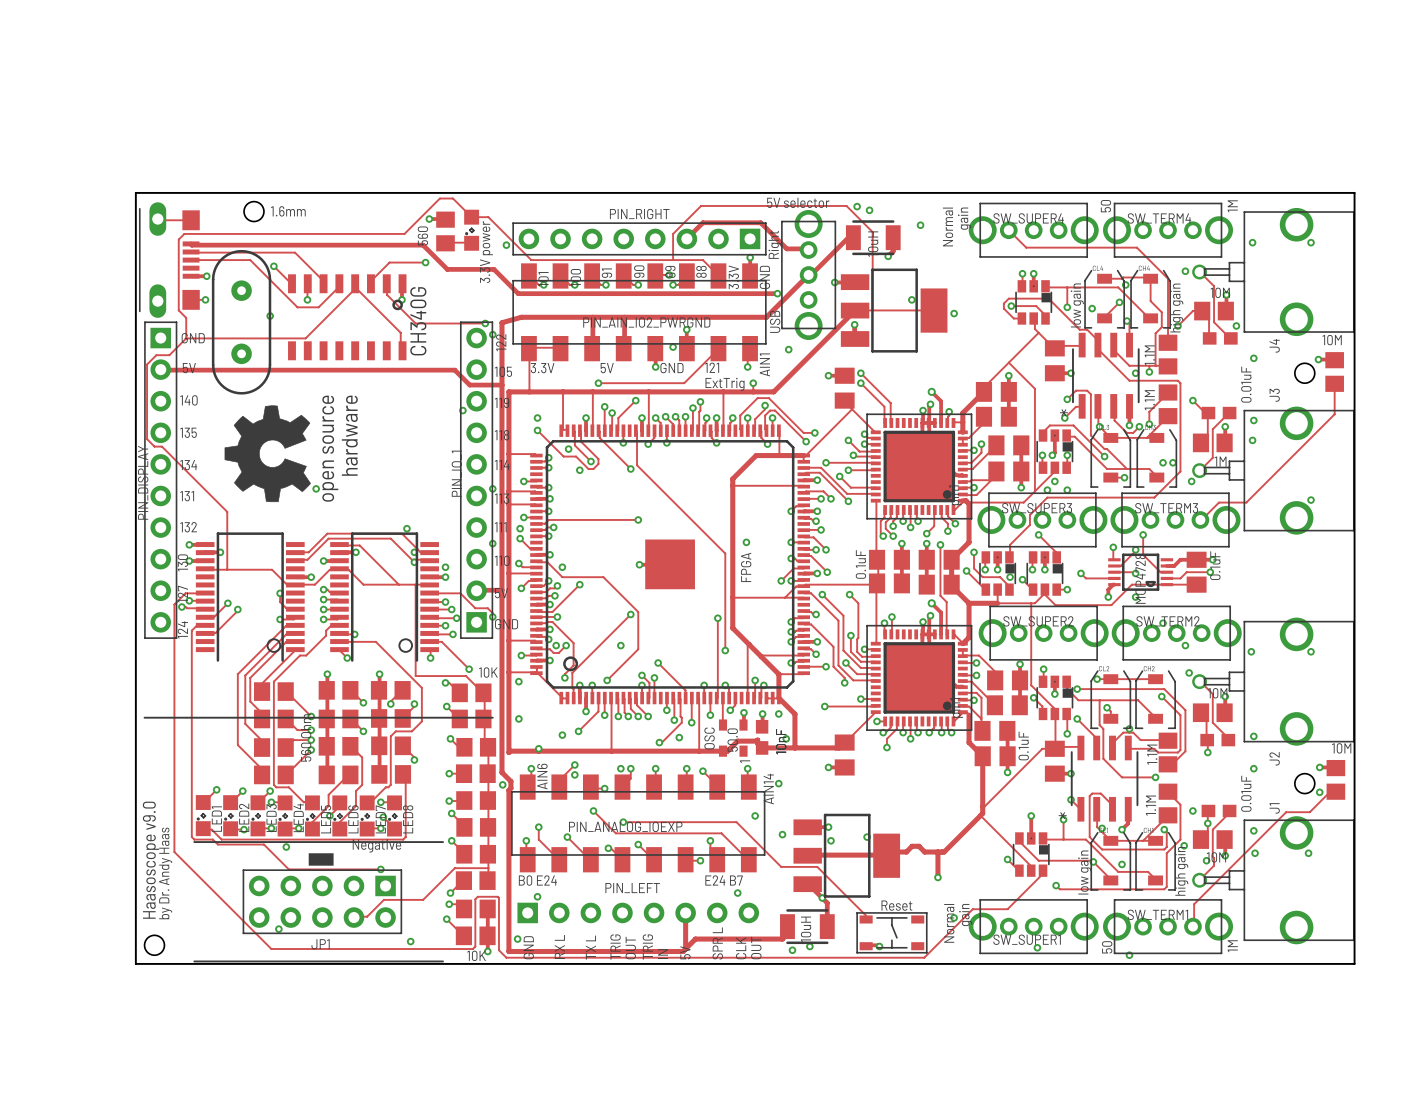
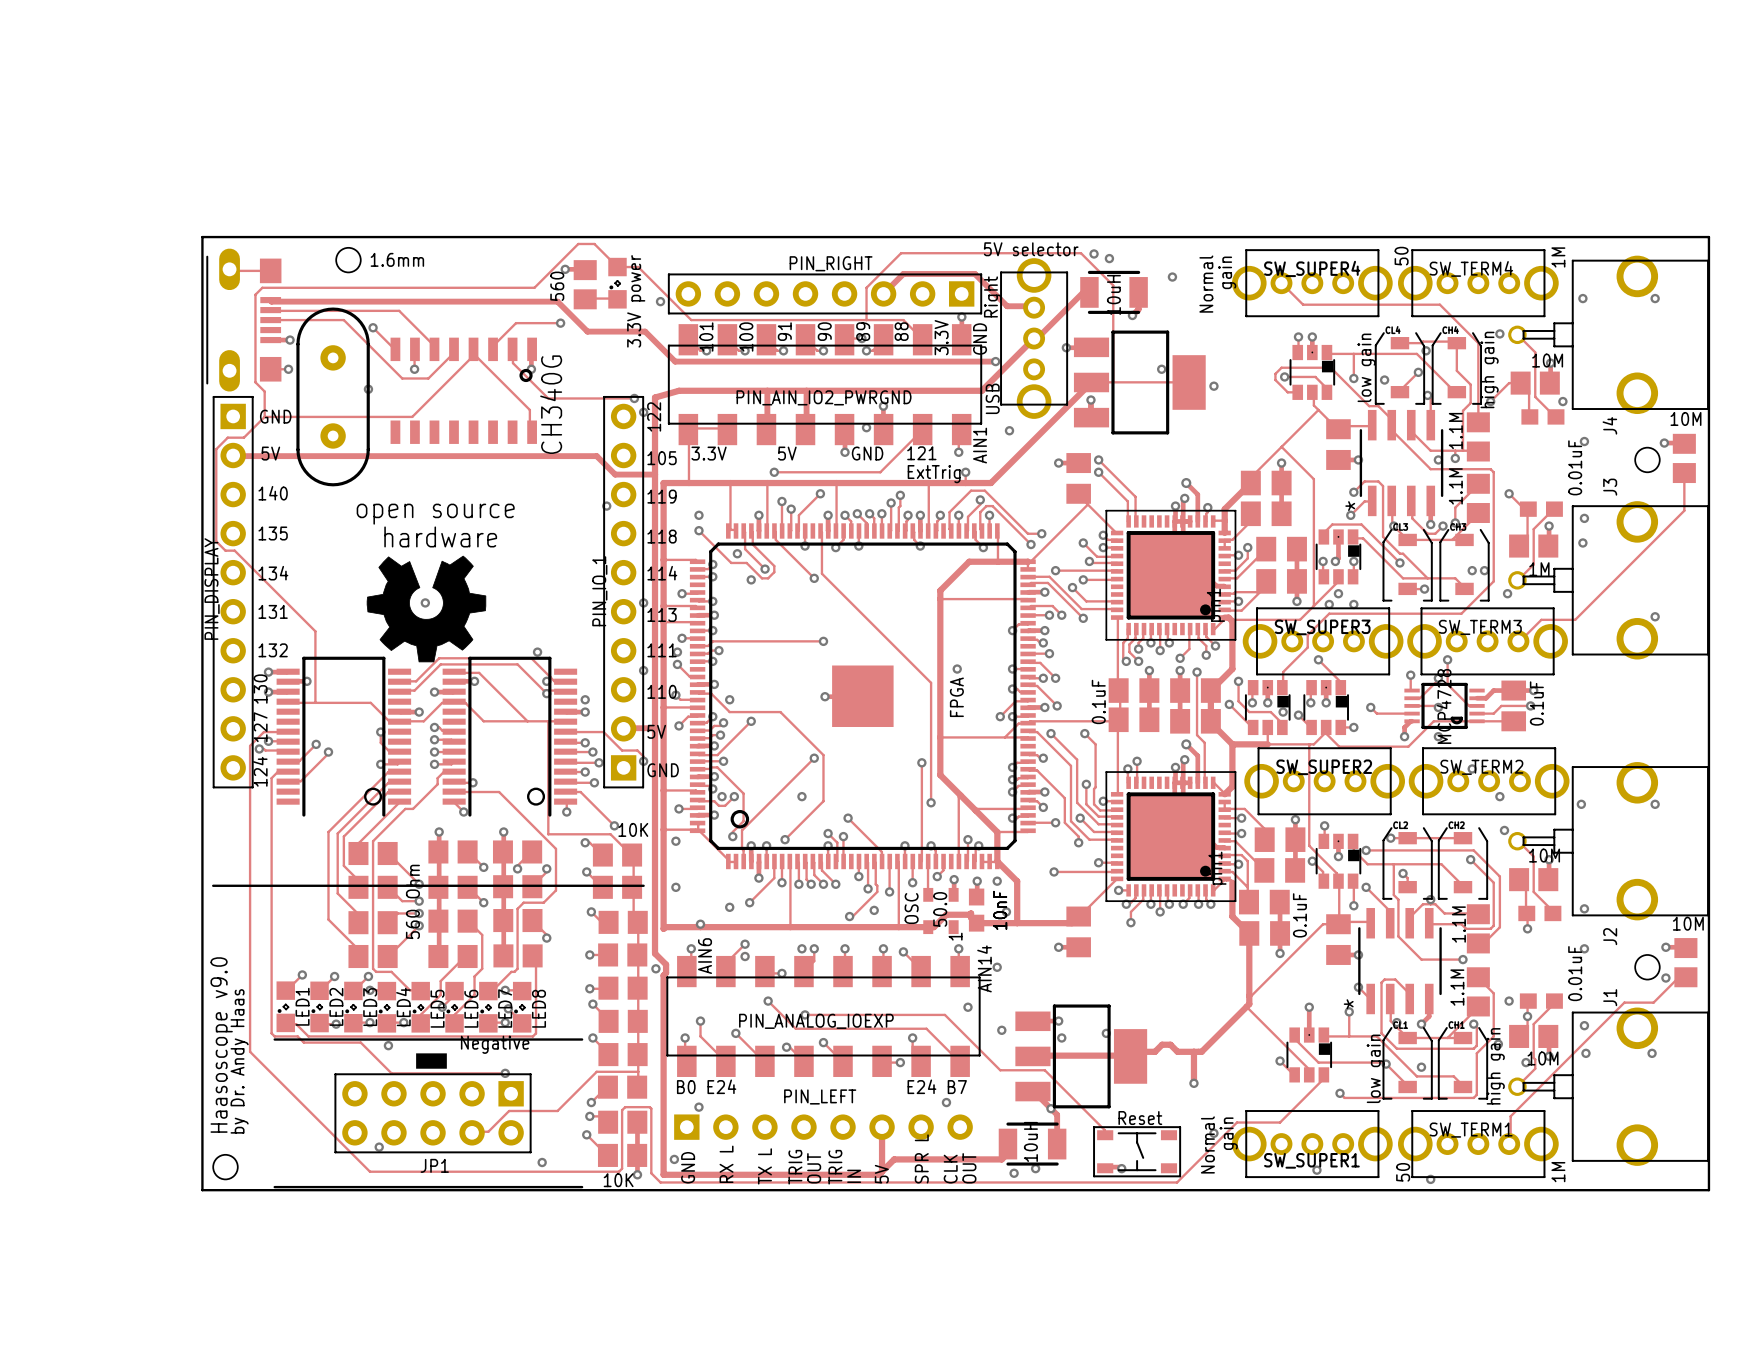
drawing: [224, 405, 311, 503] -> none
drawing: none -> [366, 555, 487, 663]

